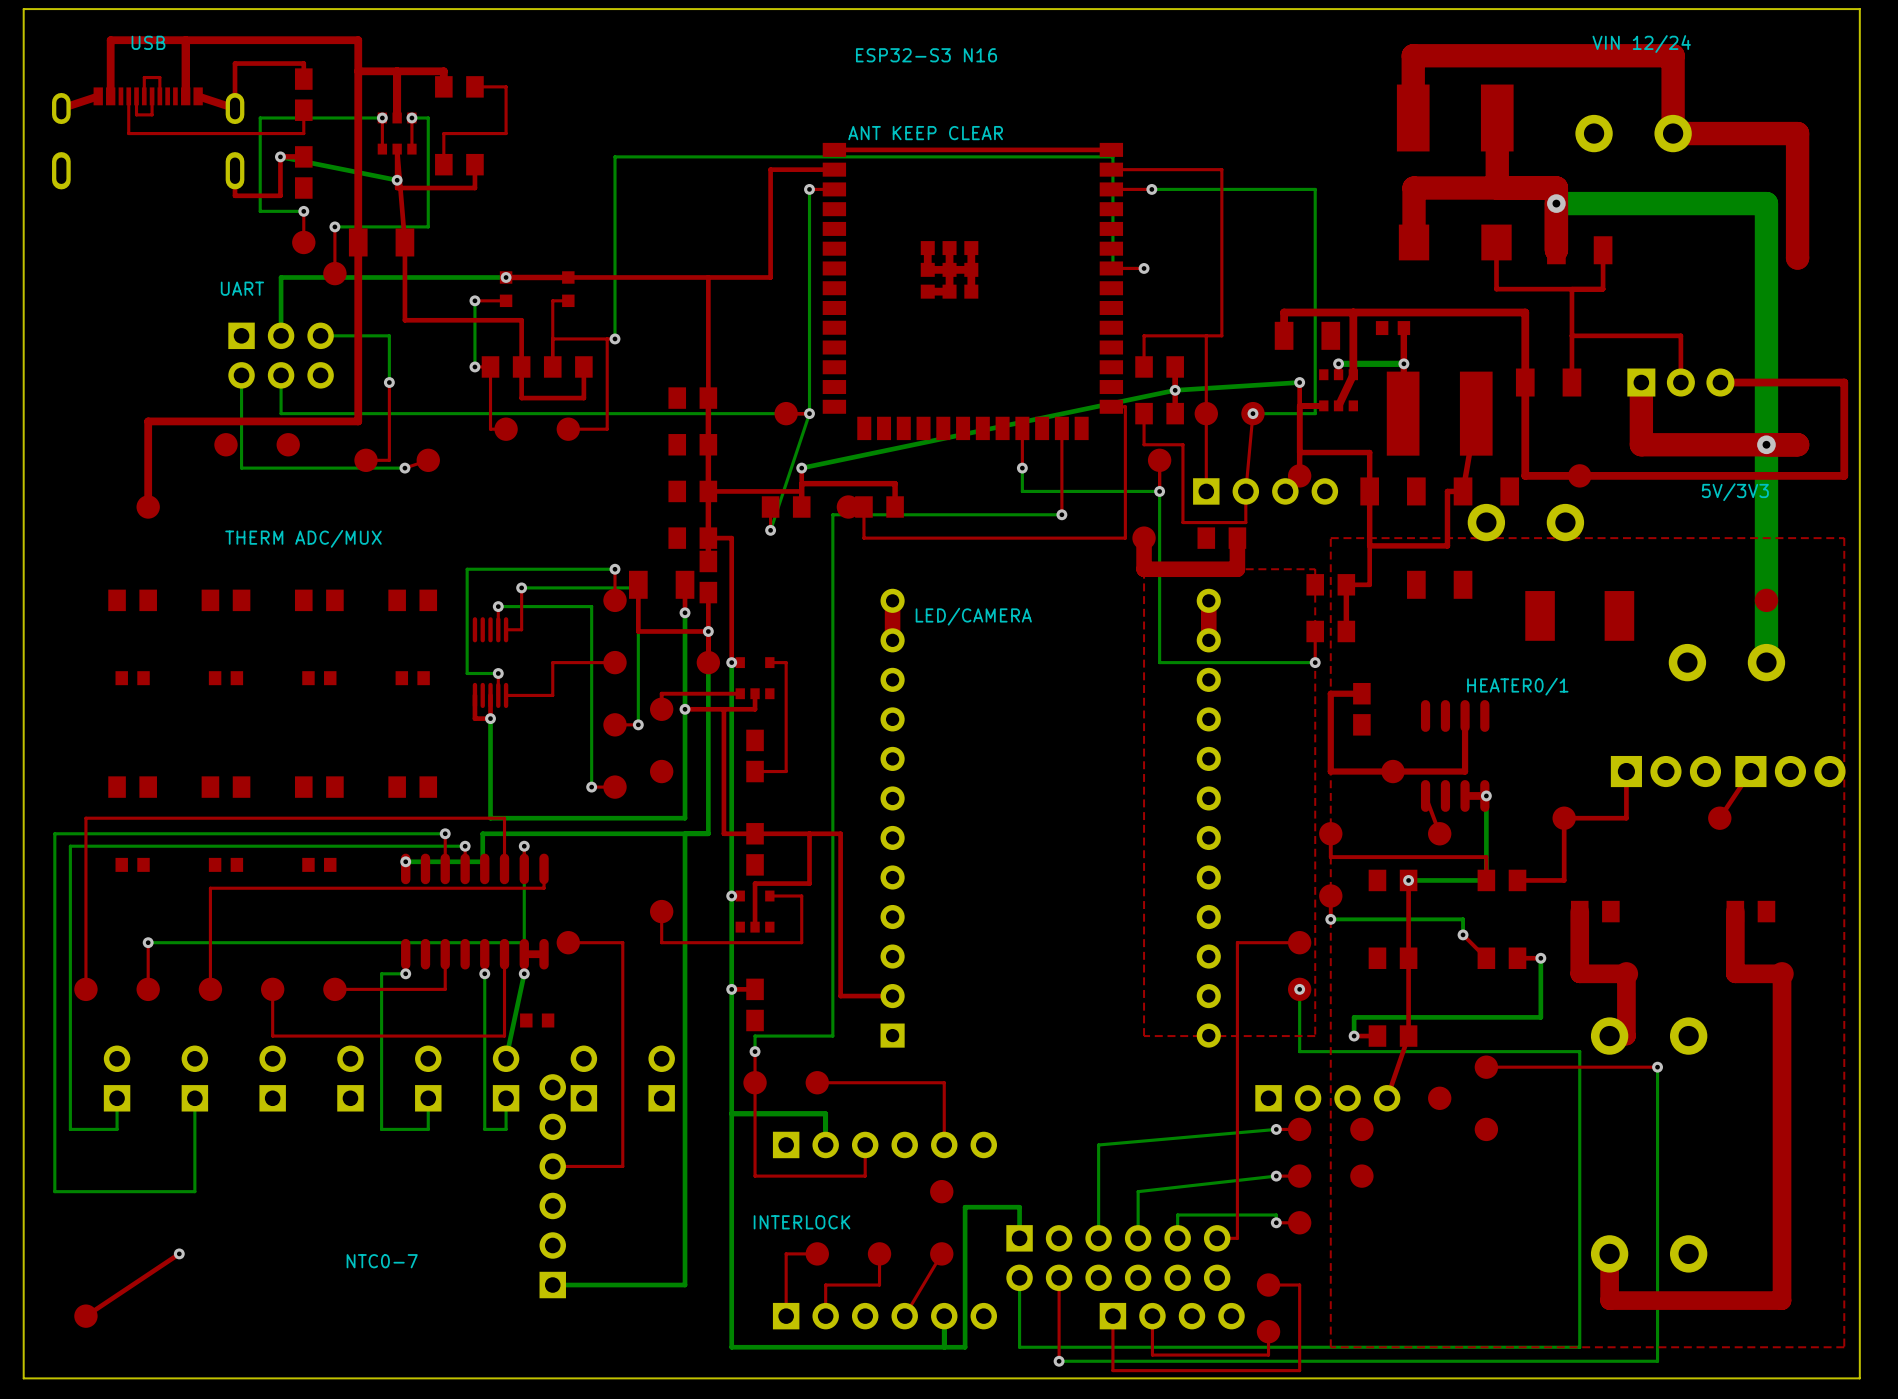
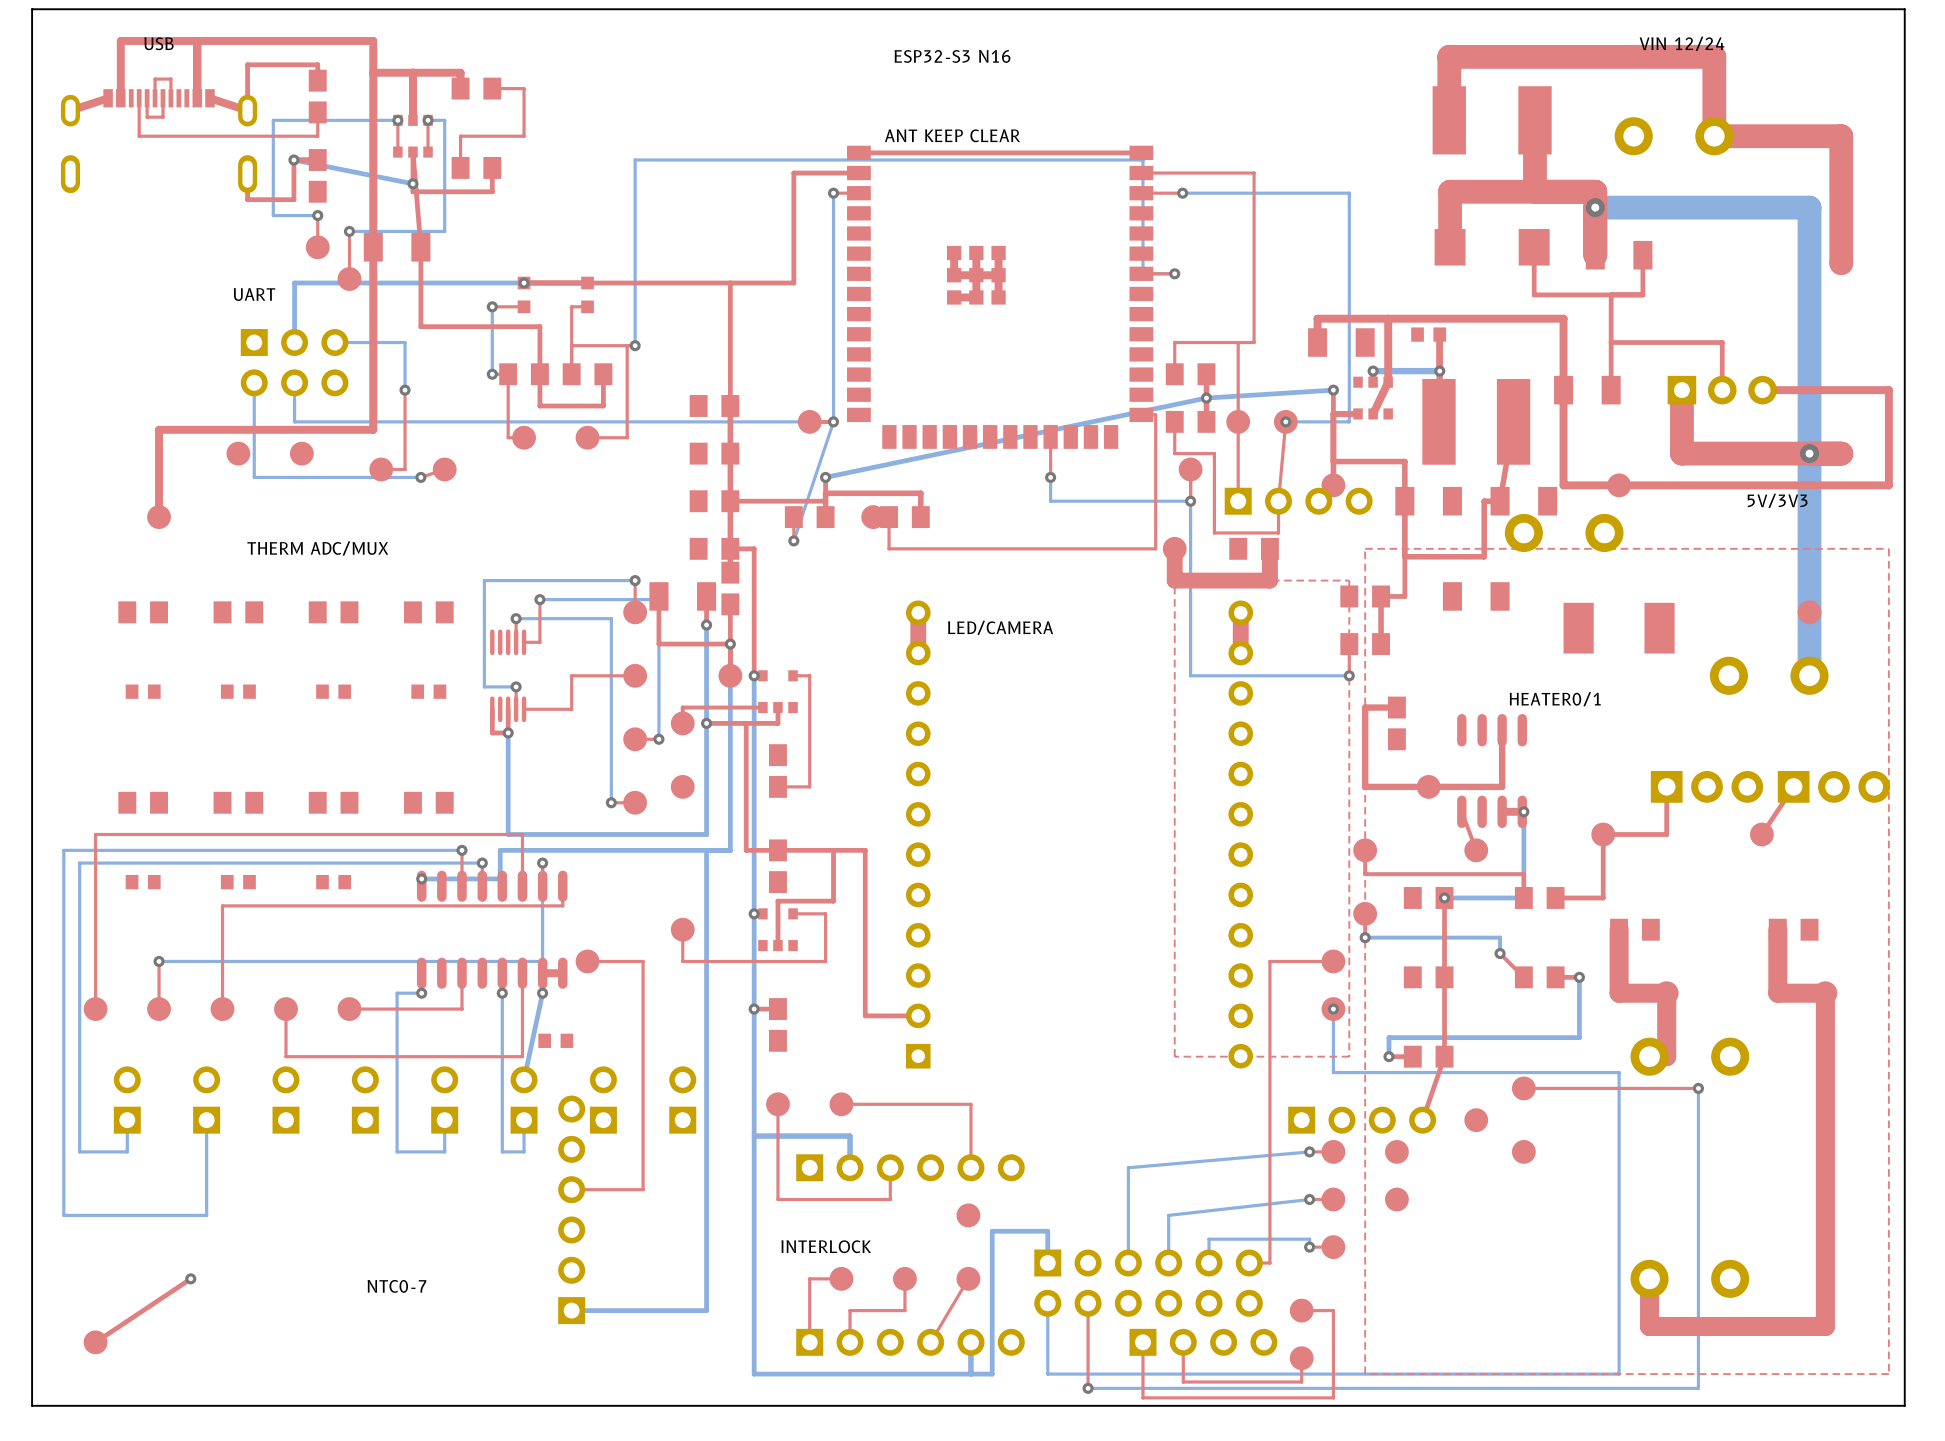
top track: (1061, 428) (1061, 514) -> none
bottom track: (1061, 514) (832, 514) (832, 1036) (755, 1036) (755, 1051) -> none
via: (1061, 514) -> none
top track: (755, 1051) (755, 1082) -> none
via: (755, 1051) -> none

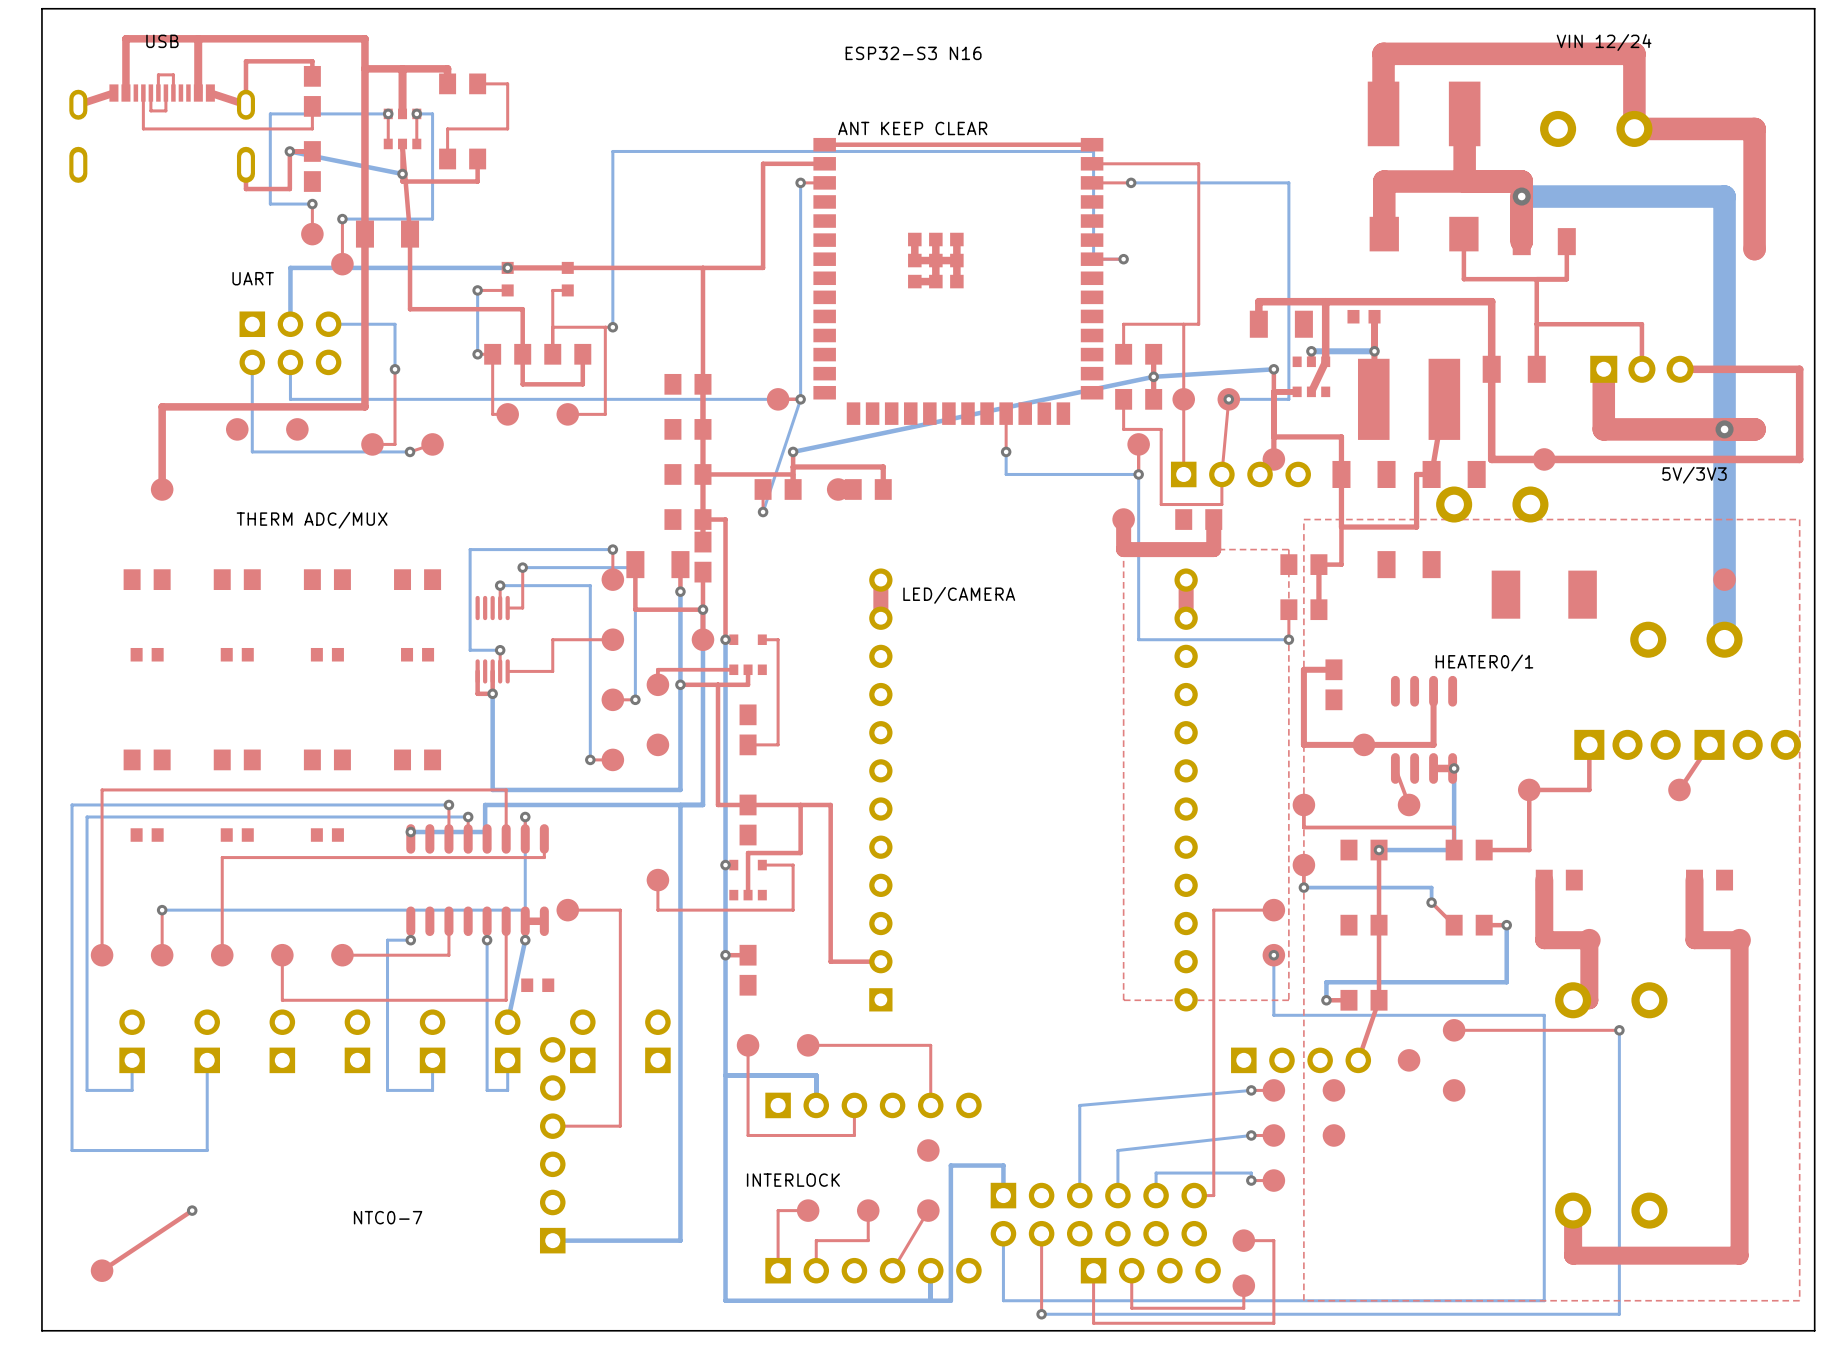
top track: (1141, 414) (1155, 414) (1155, 548) (889, 548) (889, 517) -> none

